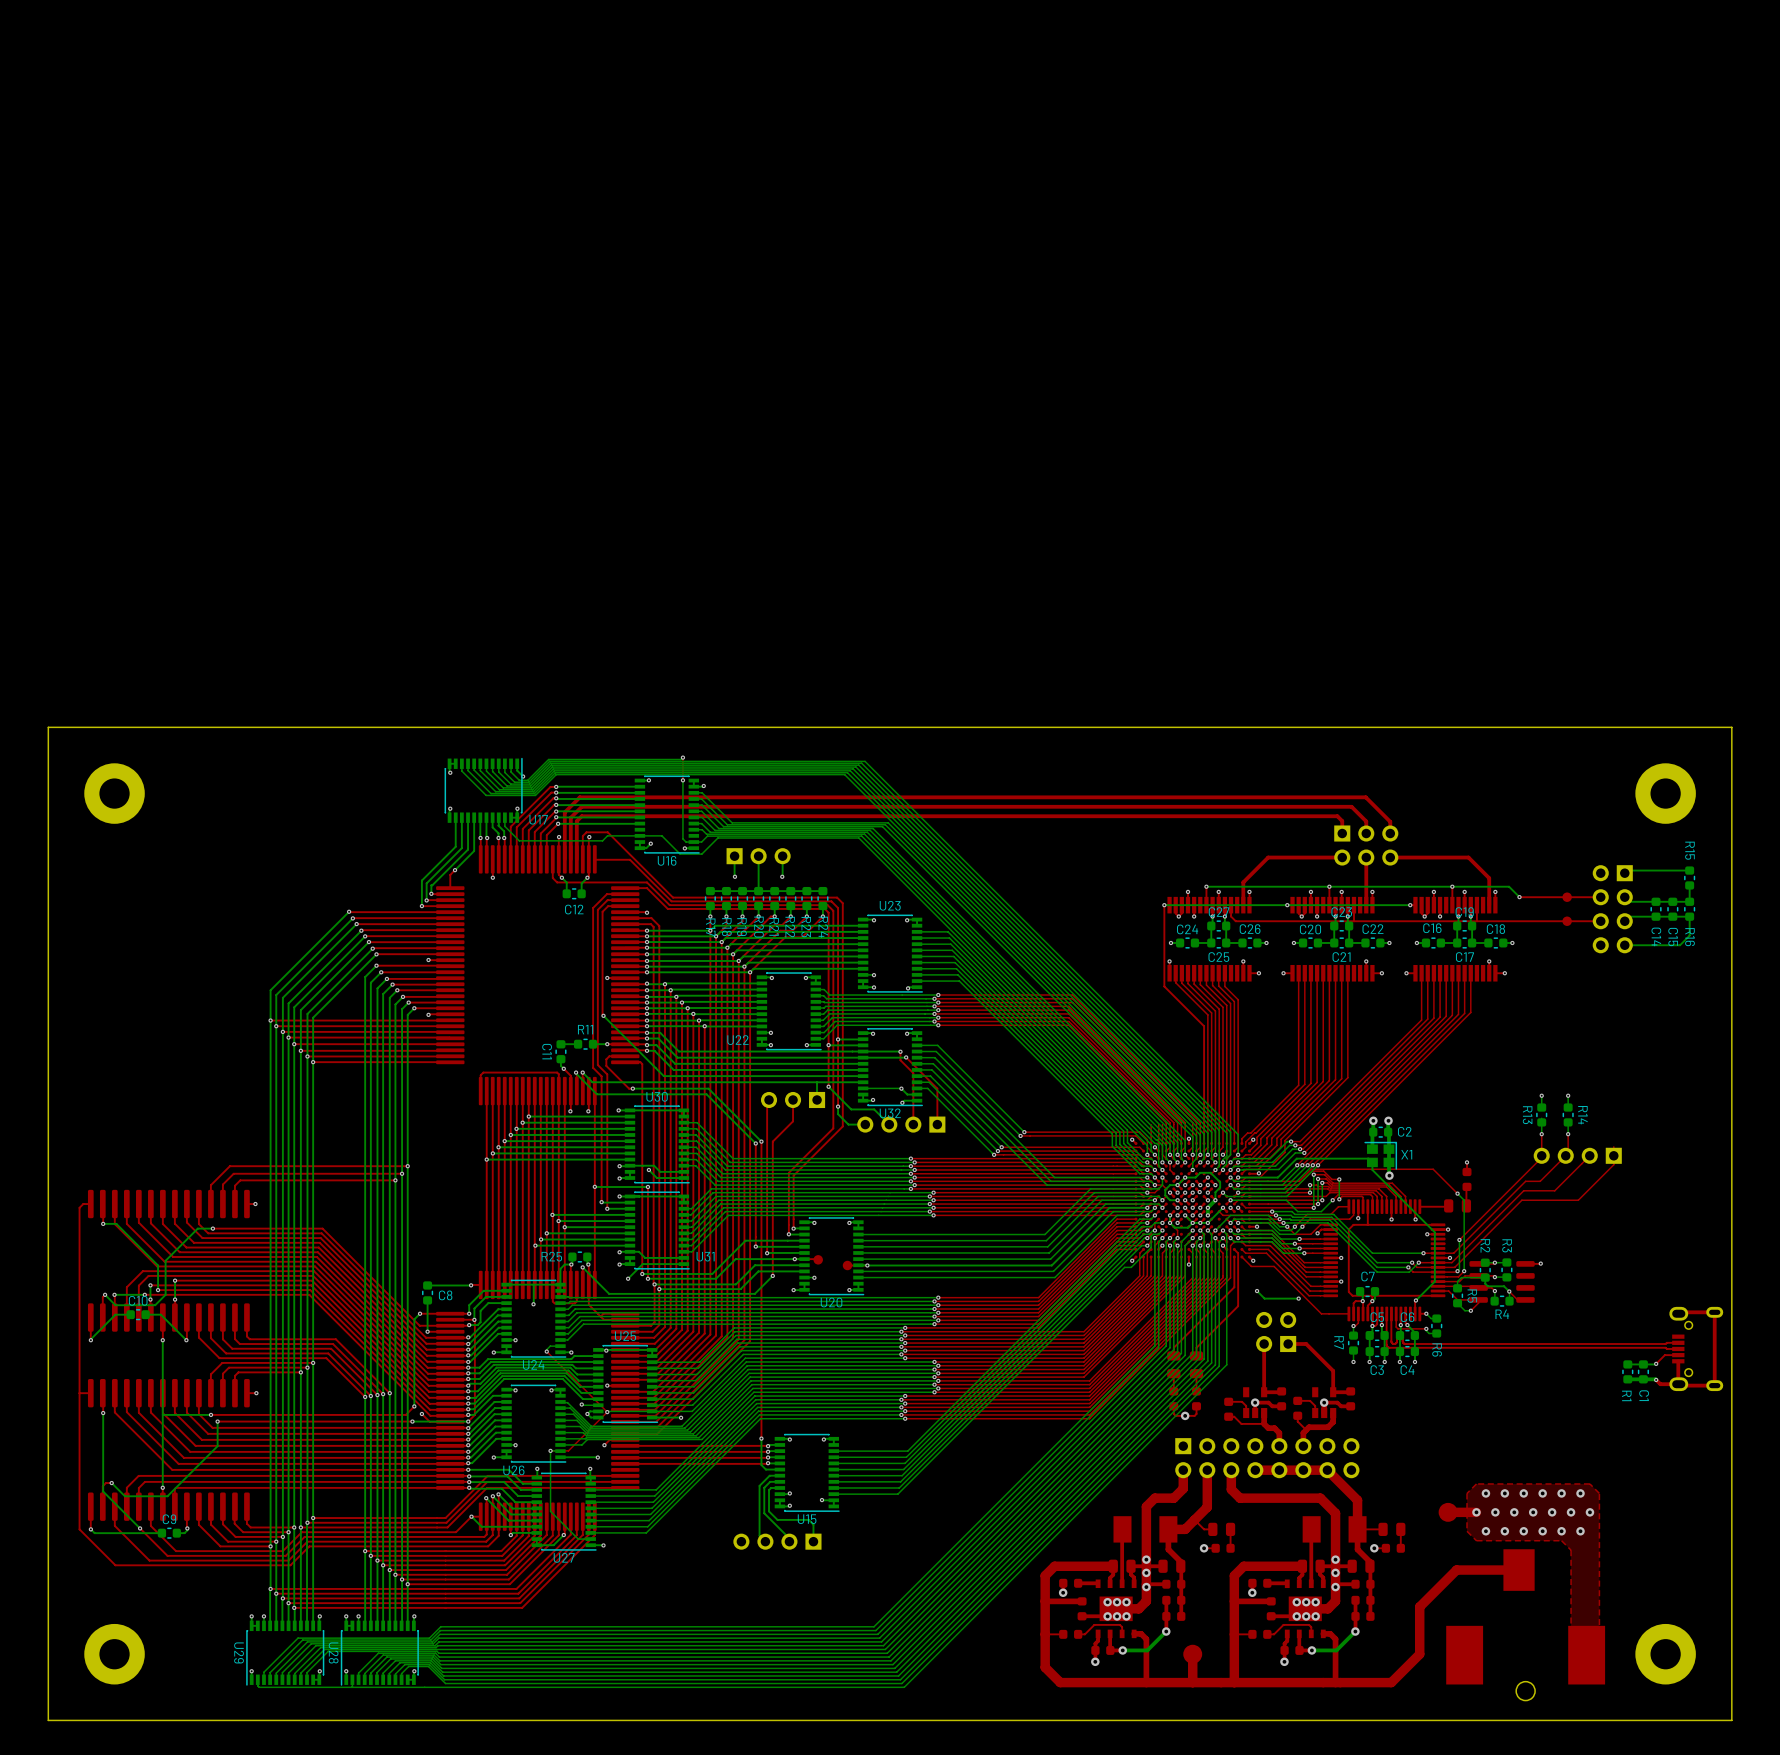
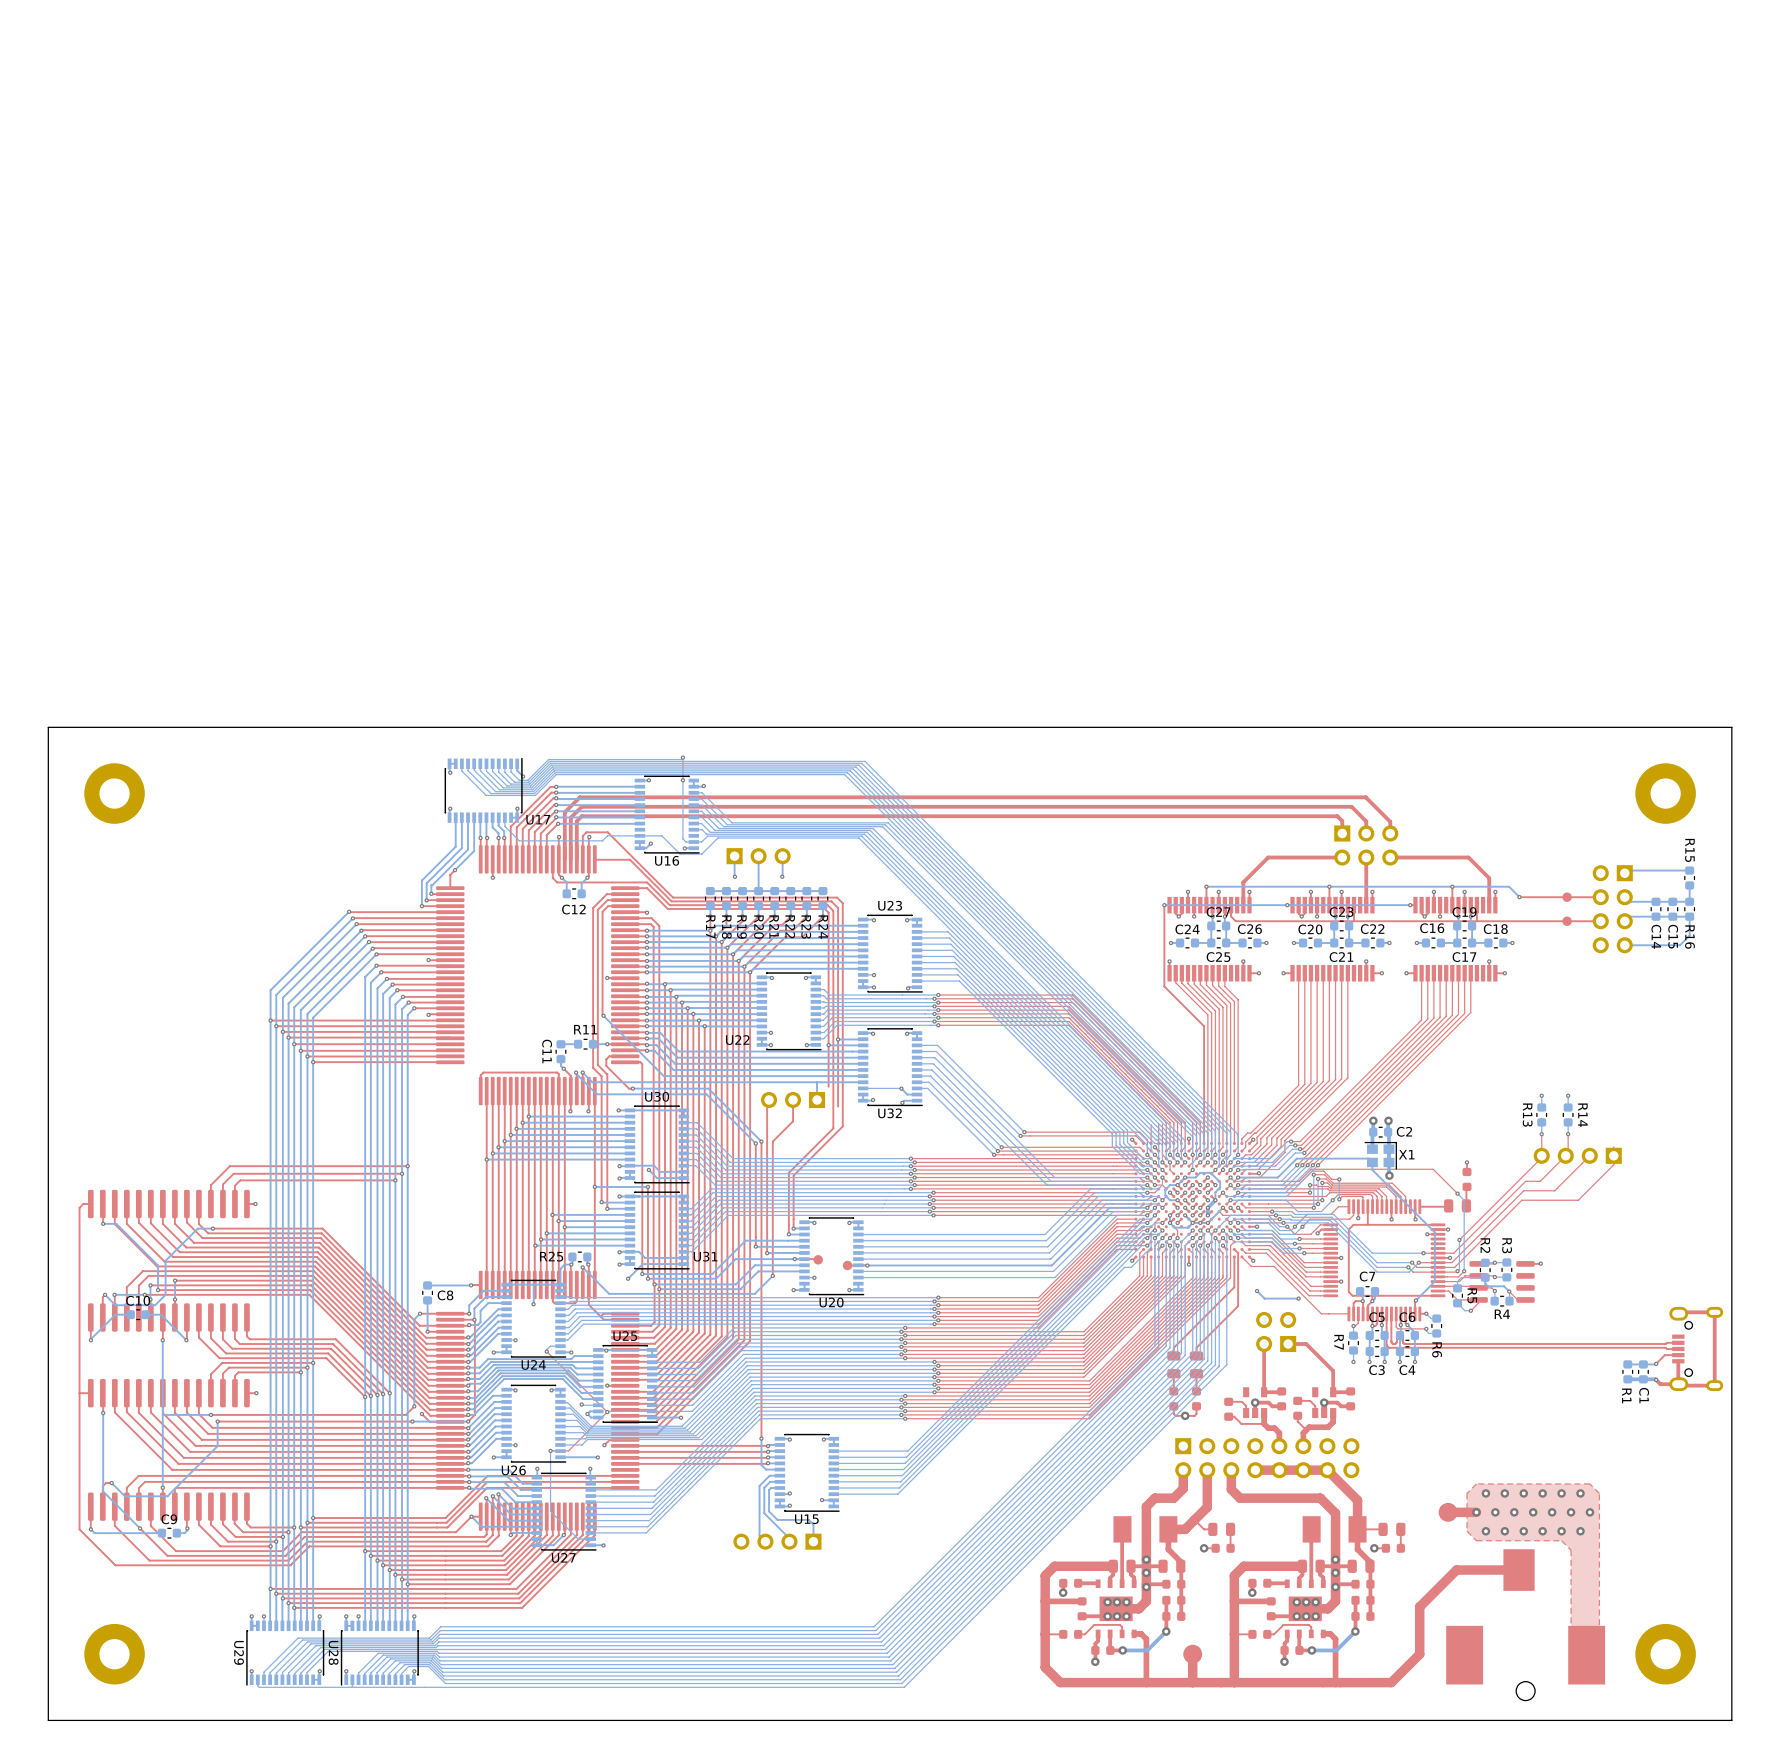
bottom track: (863, 1051) (900, 1051) -> none
top track: (900, 1051) (900, 1060) (913, 1073) (913, 1120) -> none
via: (900, 1051) -> none
top track: (906, 1057) (937, 1088) (937, 1120) -> none
bottom track: (906, 1057) (863, 1057) -> none
via: (906, 1057) -> none
bottom track: (828, 1086) (851, 1109) (874, 1109) (889, 1124) -> none
via: (828, 1086) -> none
bottom track: (838, 1106) (838, 1114) (848, 1124) (865, 1124) -> none
via: (838, 1106) -> none
part: (901, 1124) -> none

